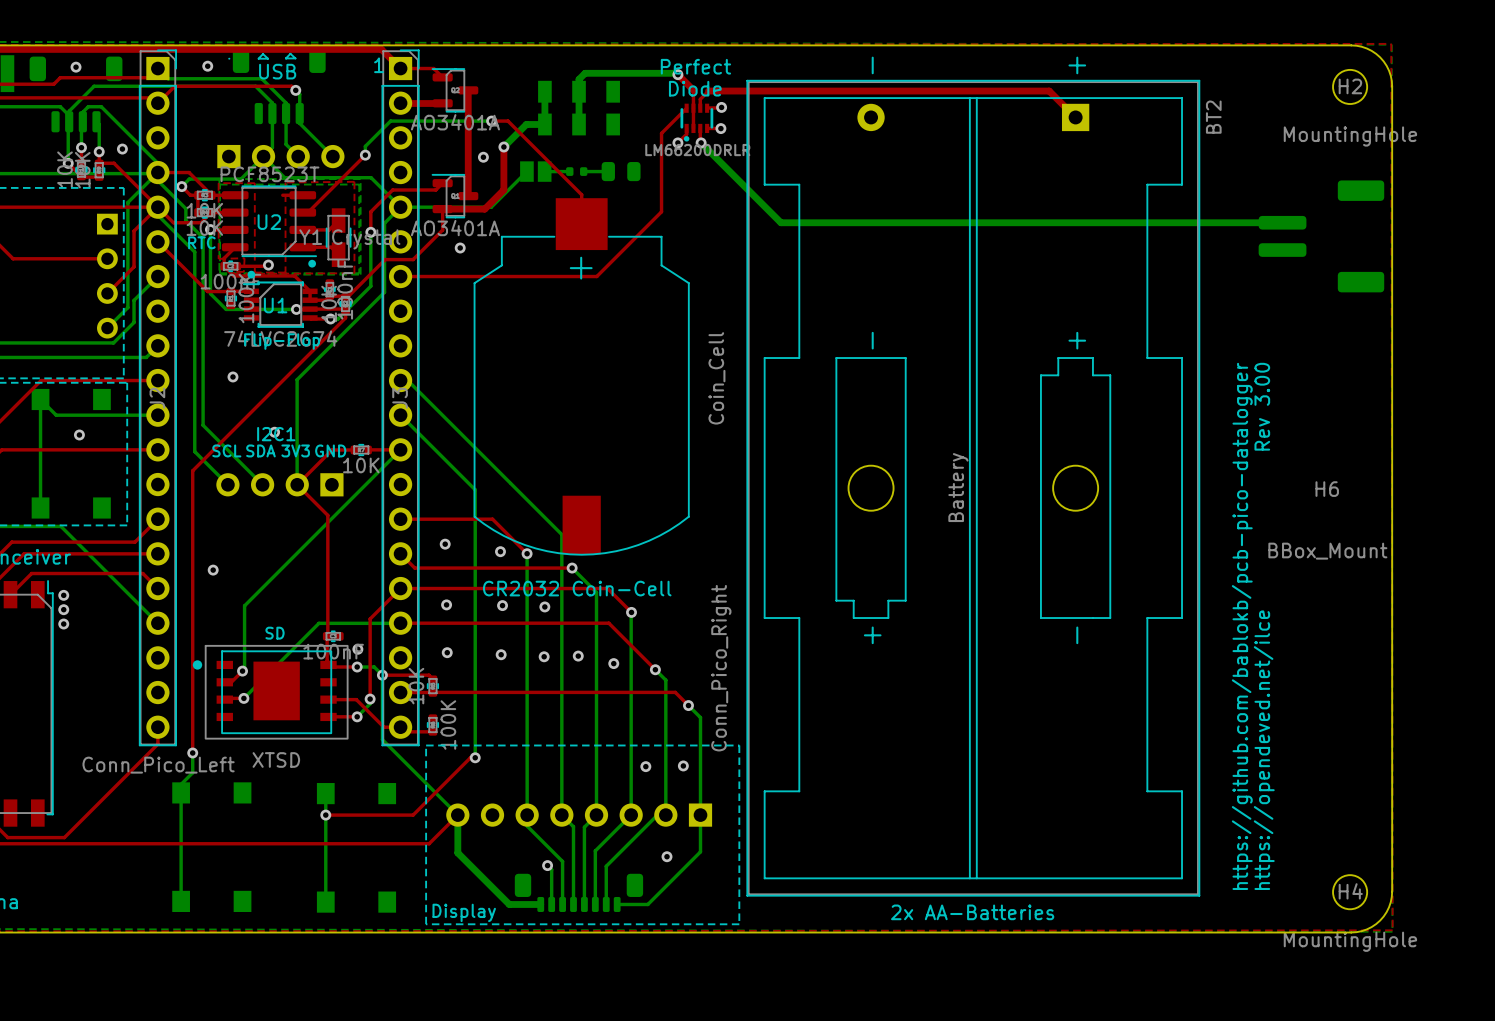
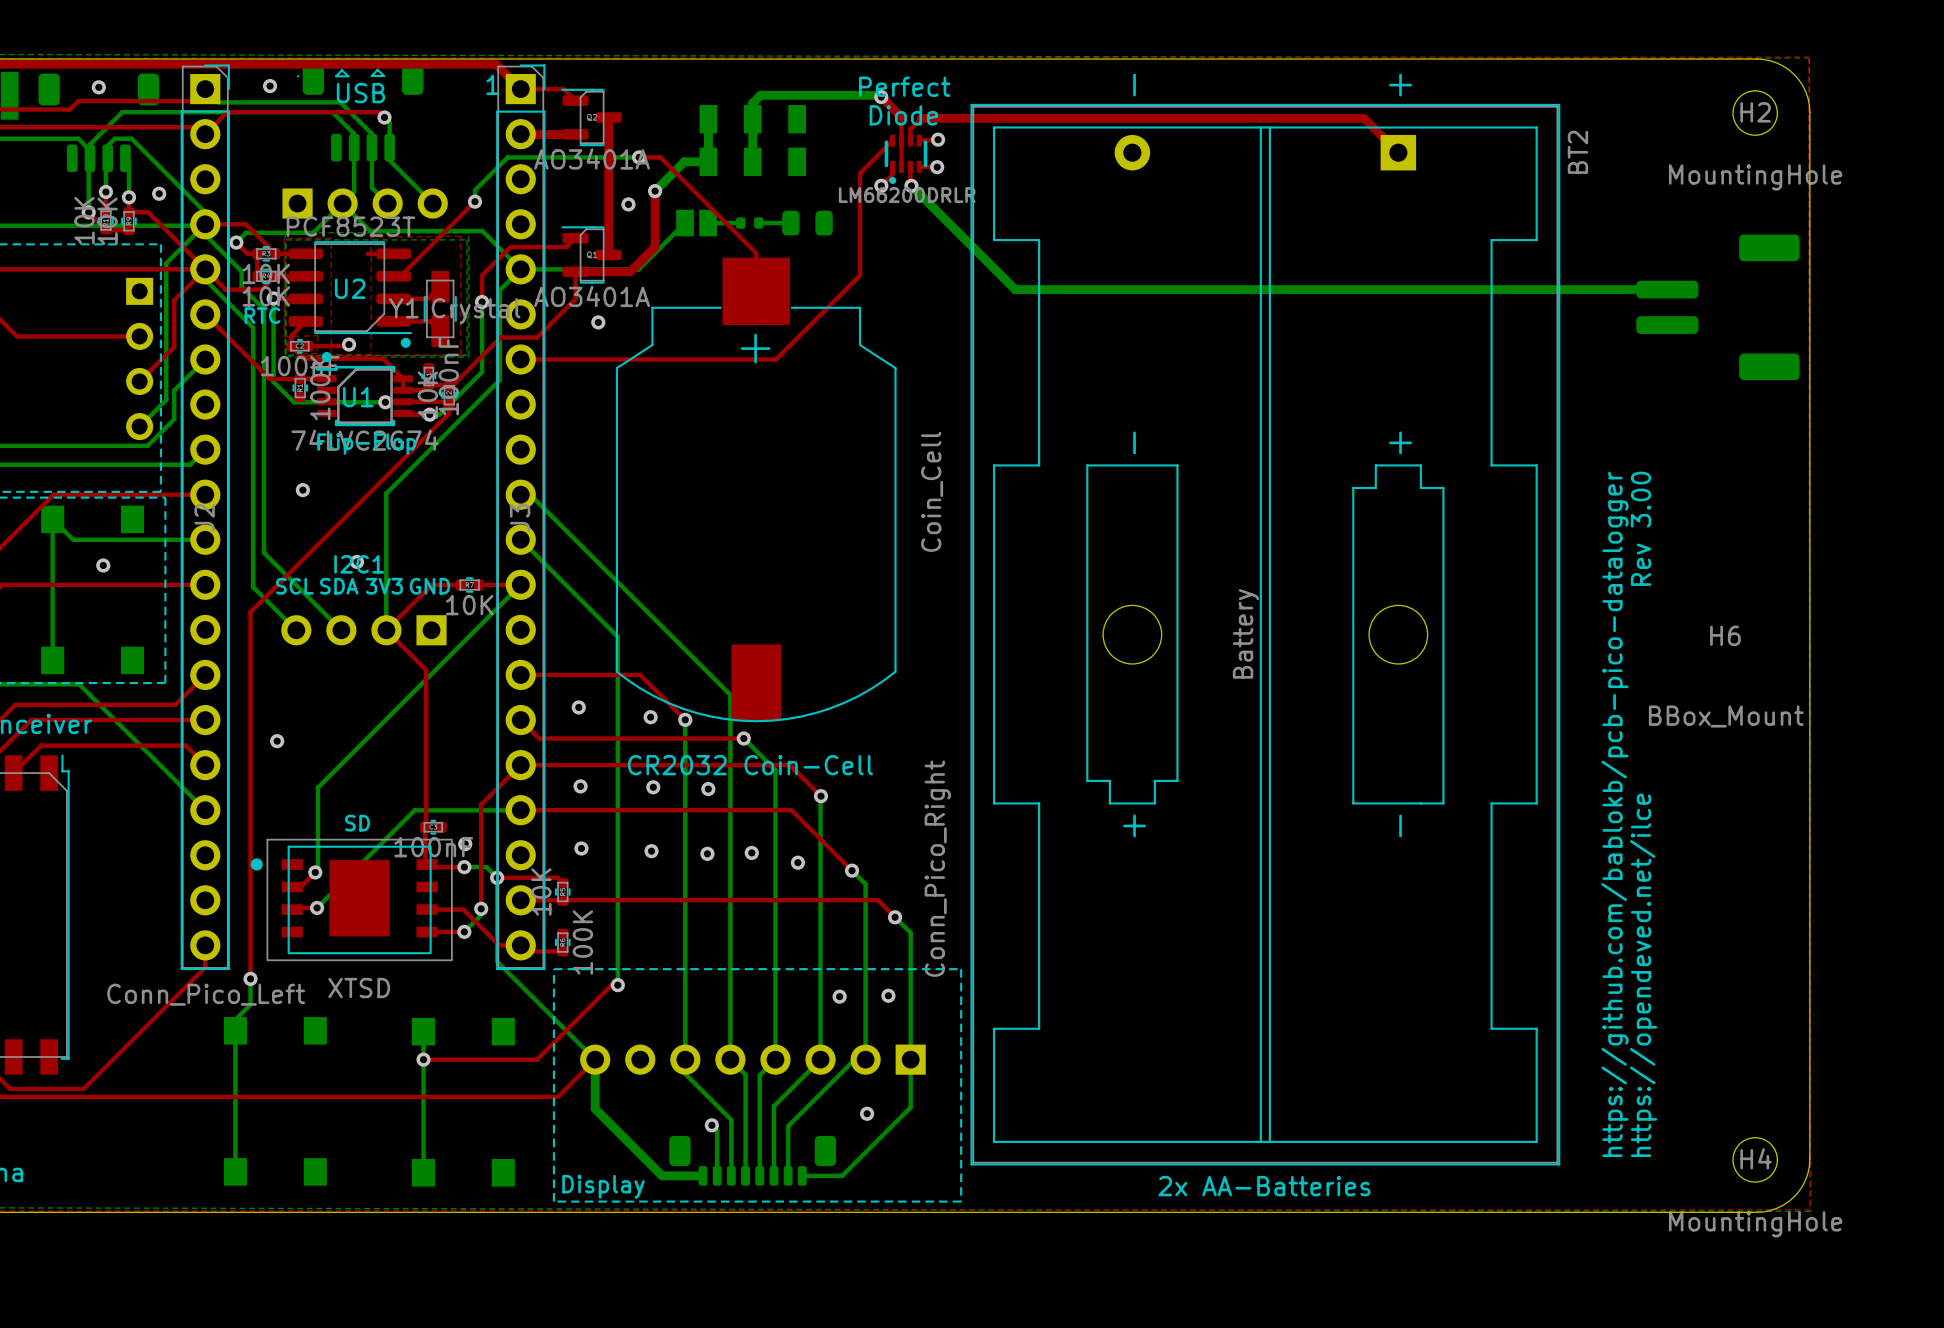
via: (63, 595) -> none
via: (63, 609) -> none
via: (63, 624) -> none

